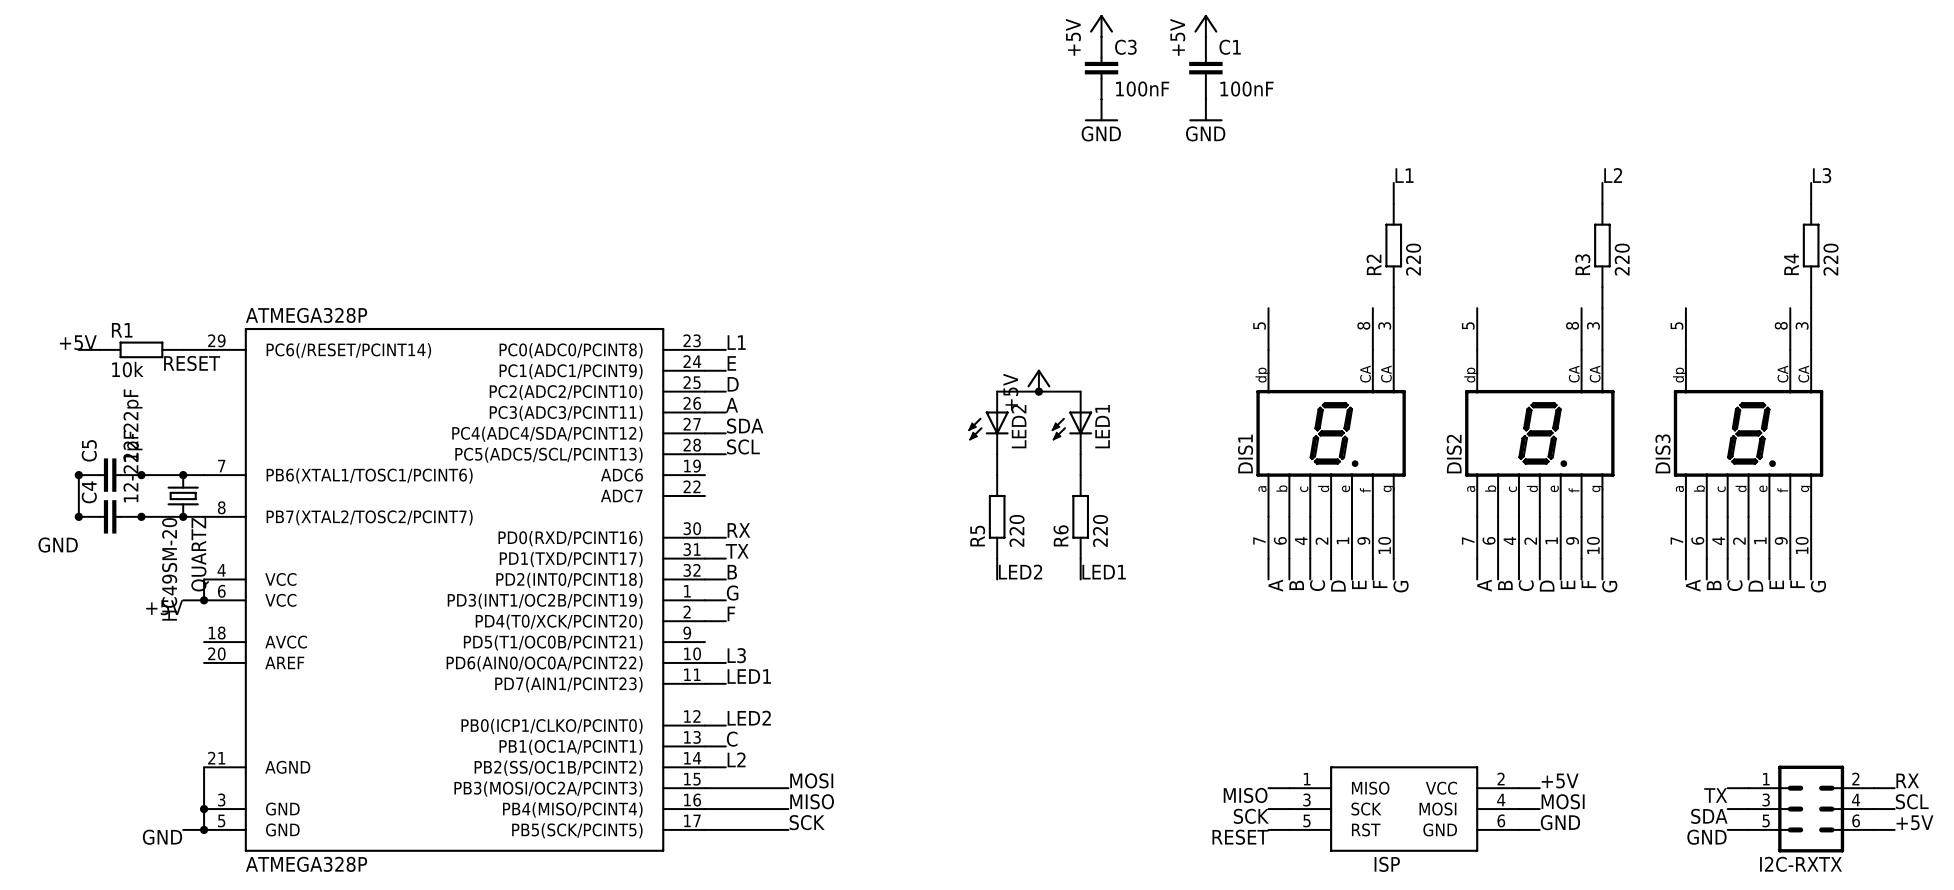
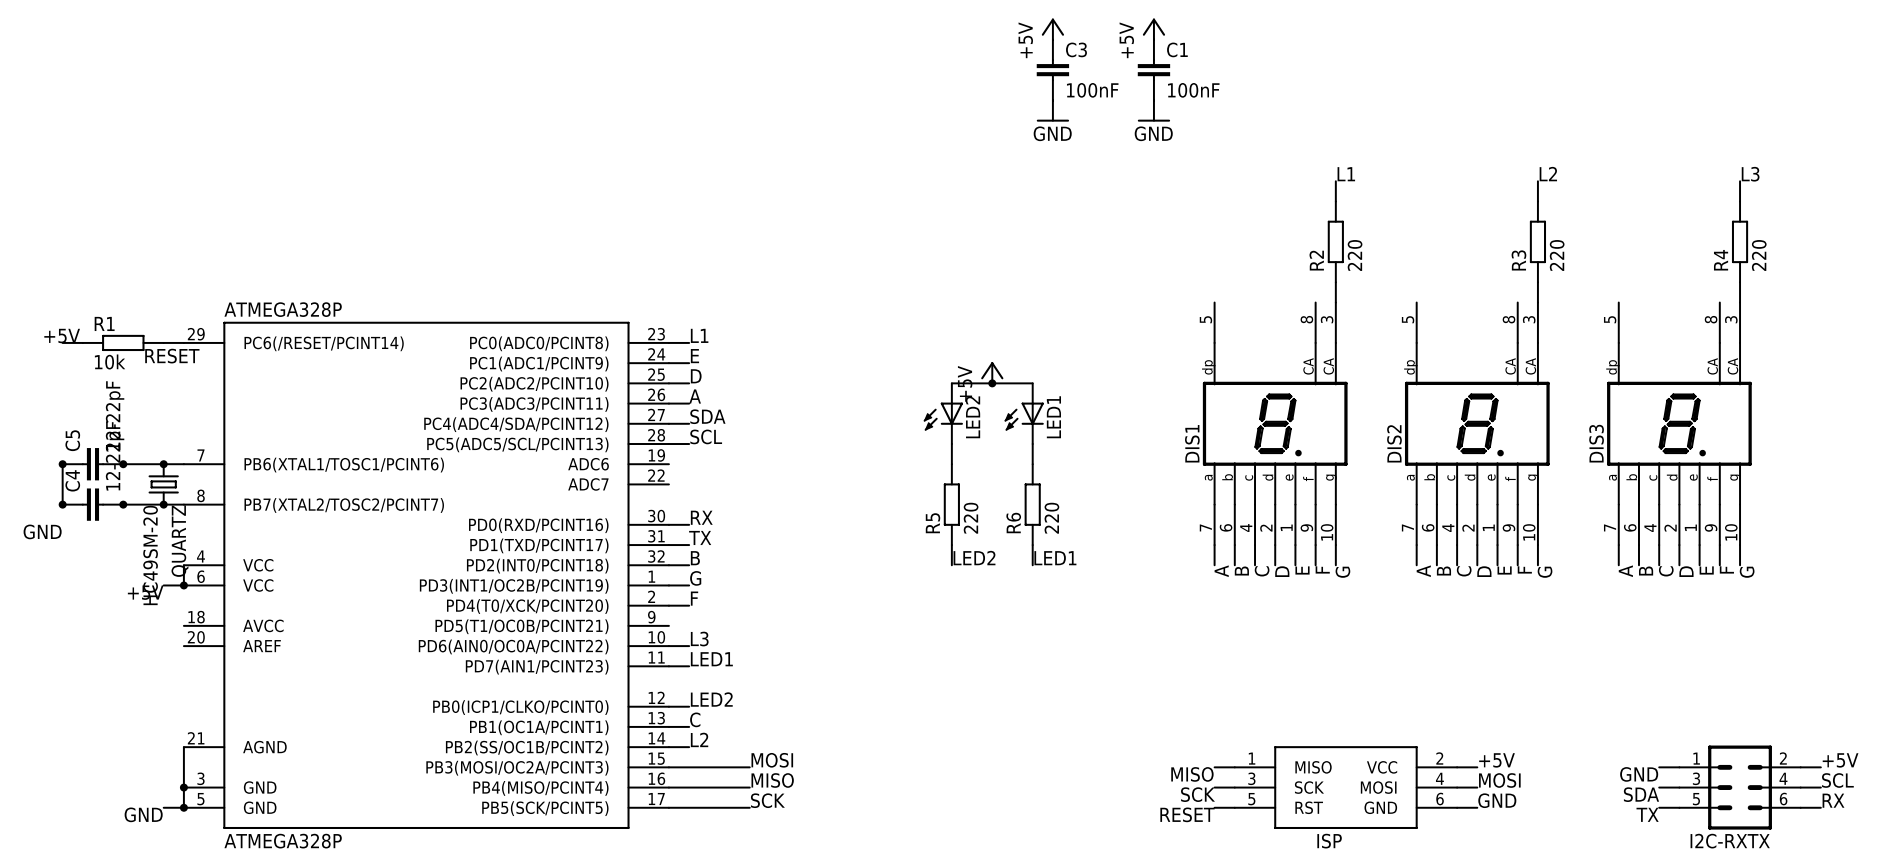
label: RX (1907, 780) -> +5V (1840, 760)
label: TX (1715, 795) -> GND (1639, 774)
label: +5V (1914, 822) -> RX (1833, 800)
label: GND (1706, 837) -> TX (1647, 814)

